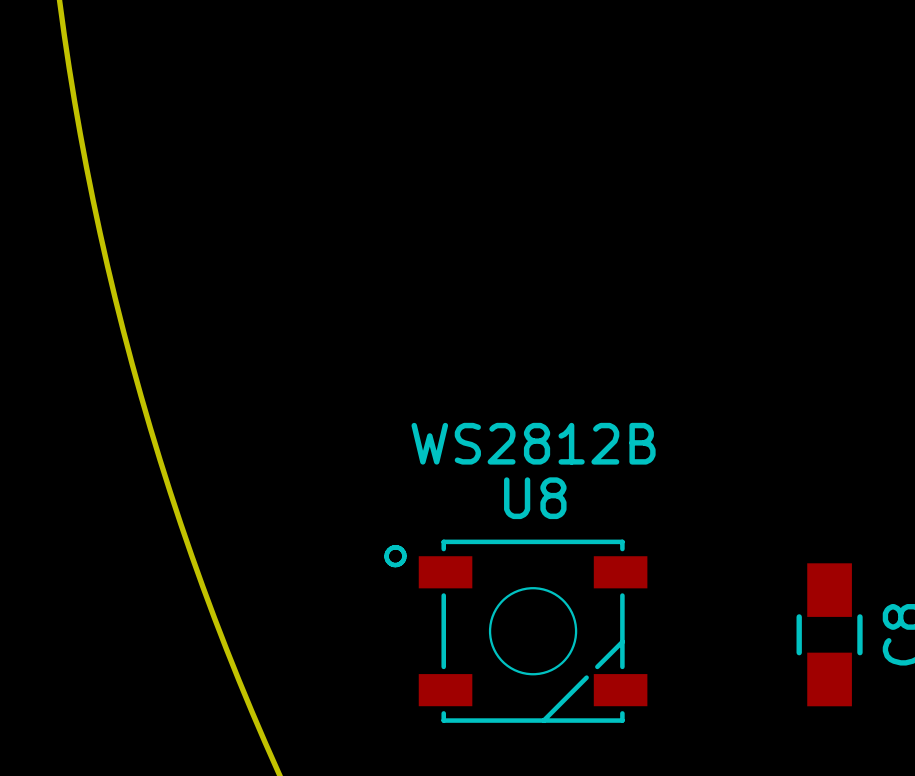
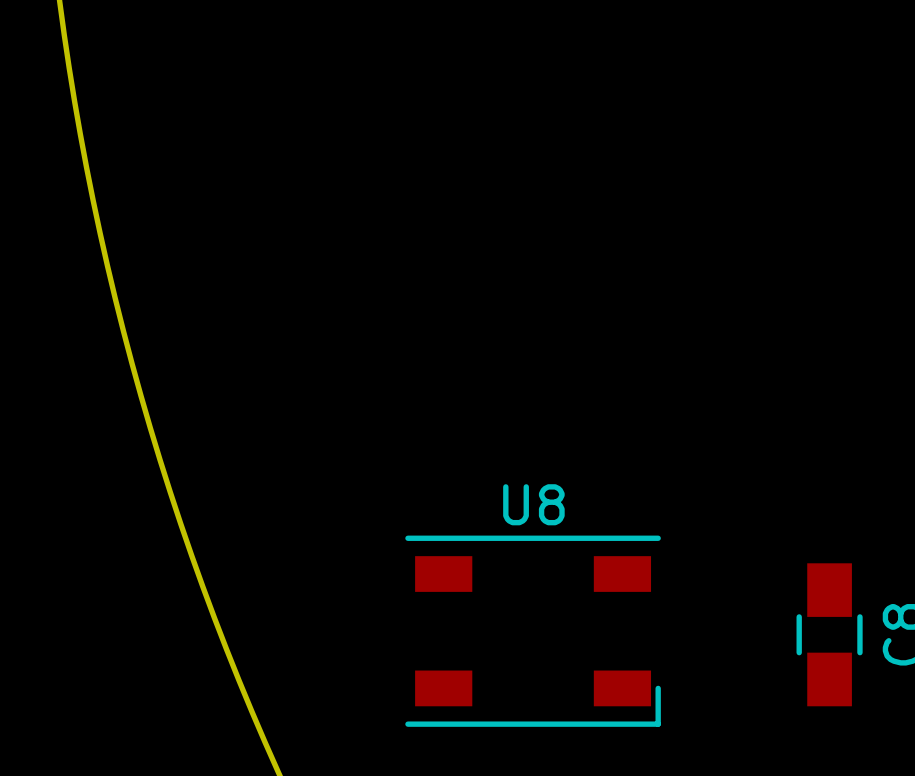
U8 value: WS2812B (533, 443) -> none
U8 footprint: [384, 539, 648, 723] -> [405, 535, 661, 727]

